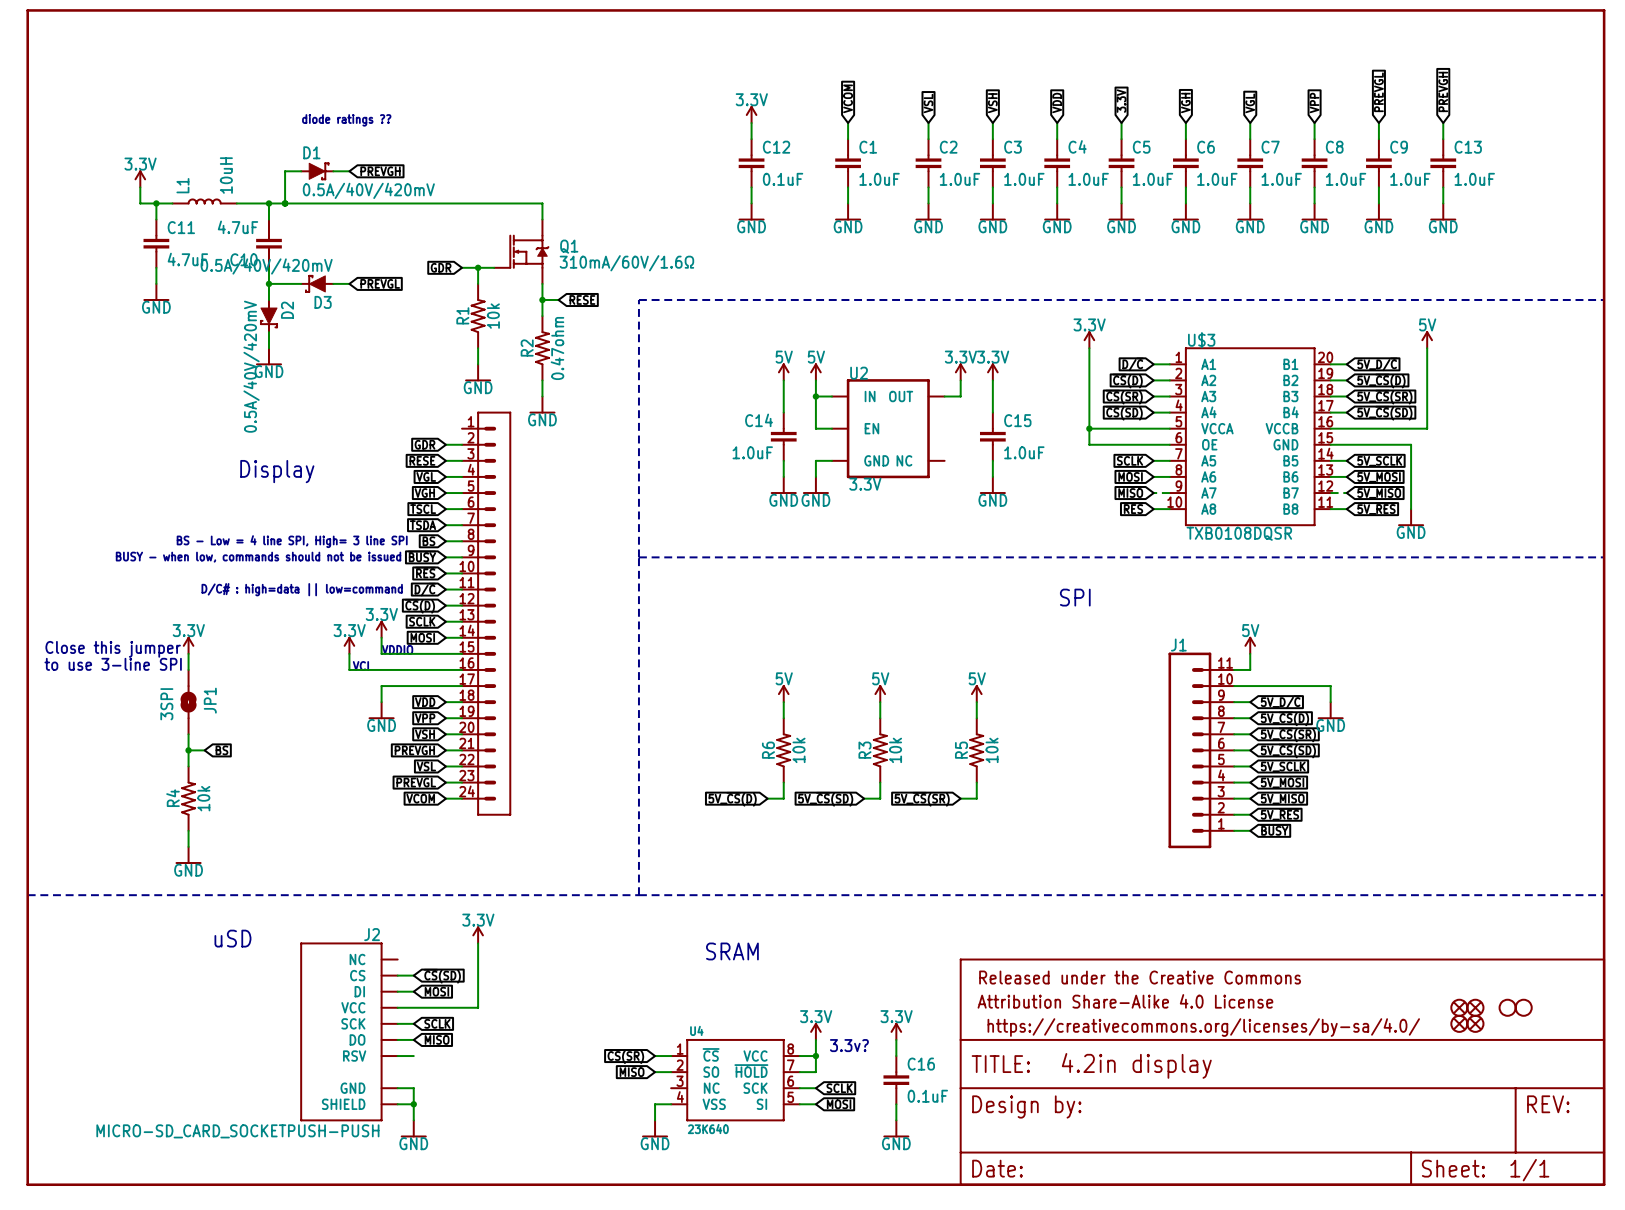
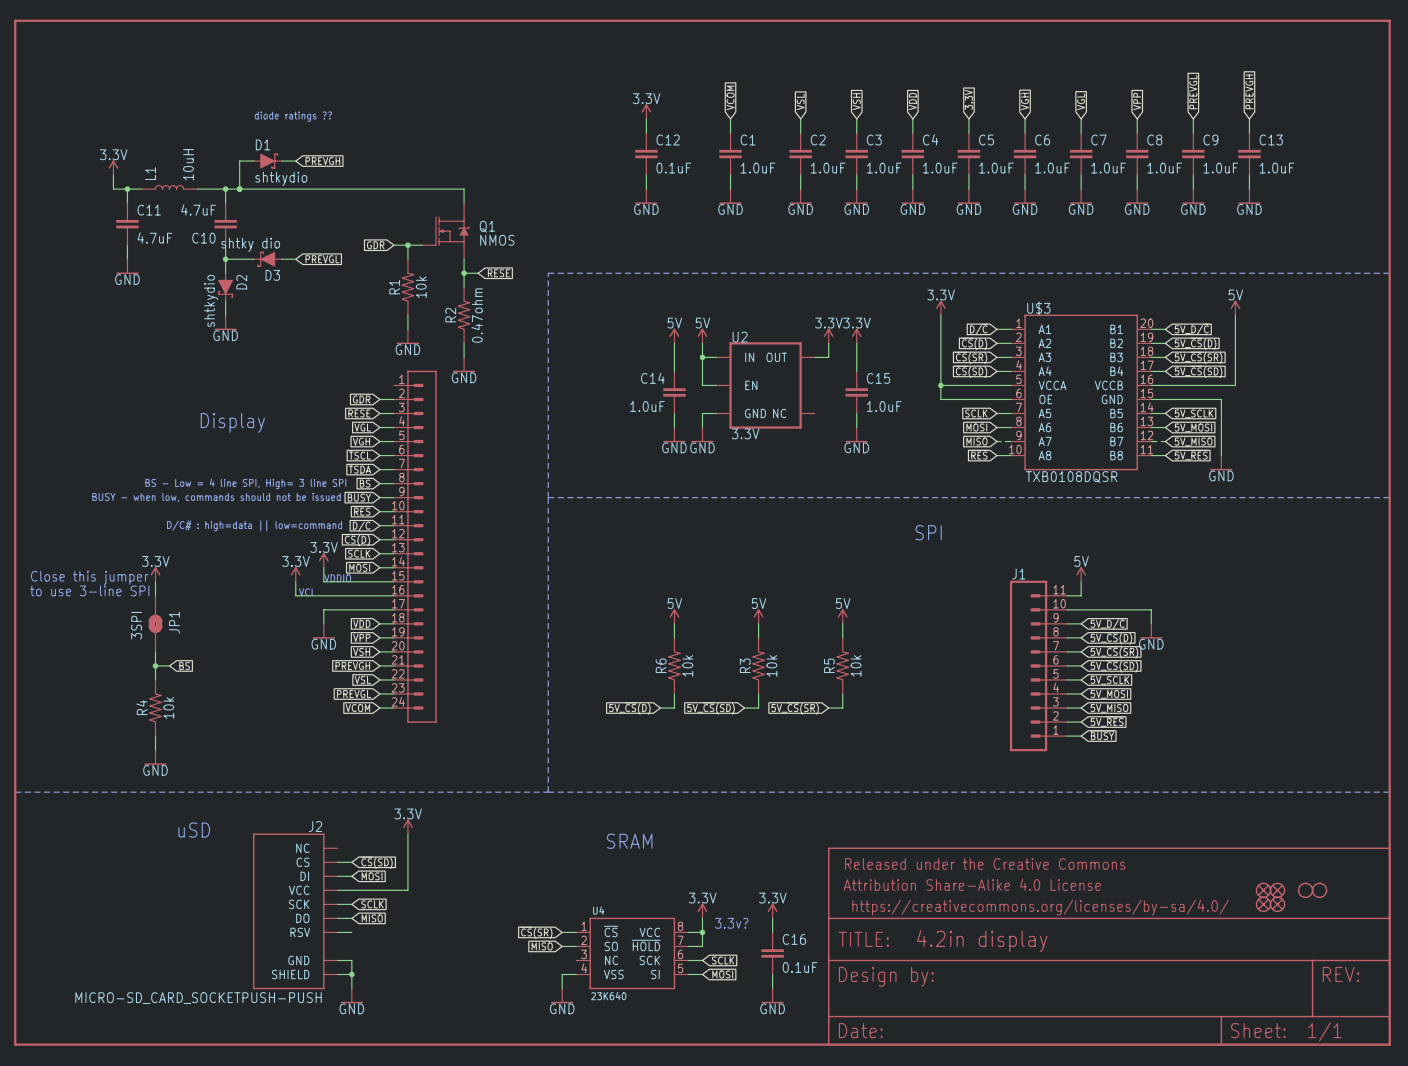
D1 value: 0.5A/40V/420mV (368, 190) -> shtkydio (281, 178)
Q1 value: 310mA/60V/1.6Ω (626, 263) -> NMOS (497, 240)
D3 value: 0.5A/40V/420mV (266, 266) -> shtky dio (250, 244)
D2 value: 0.5A/40V/420mV (251, 366) -> shtkydio (211, 300)

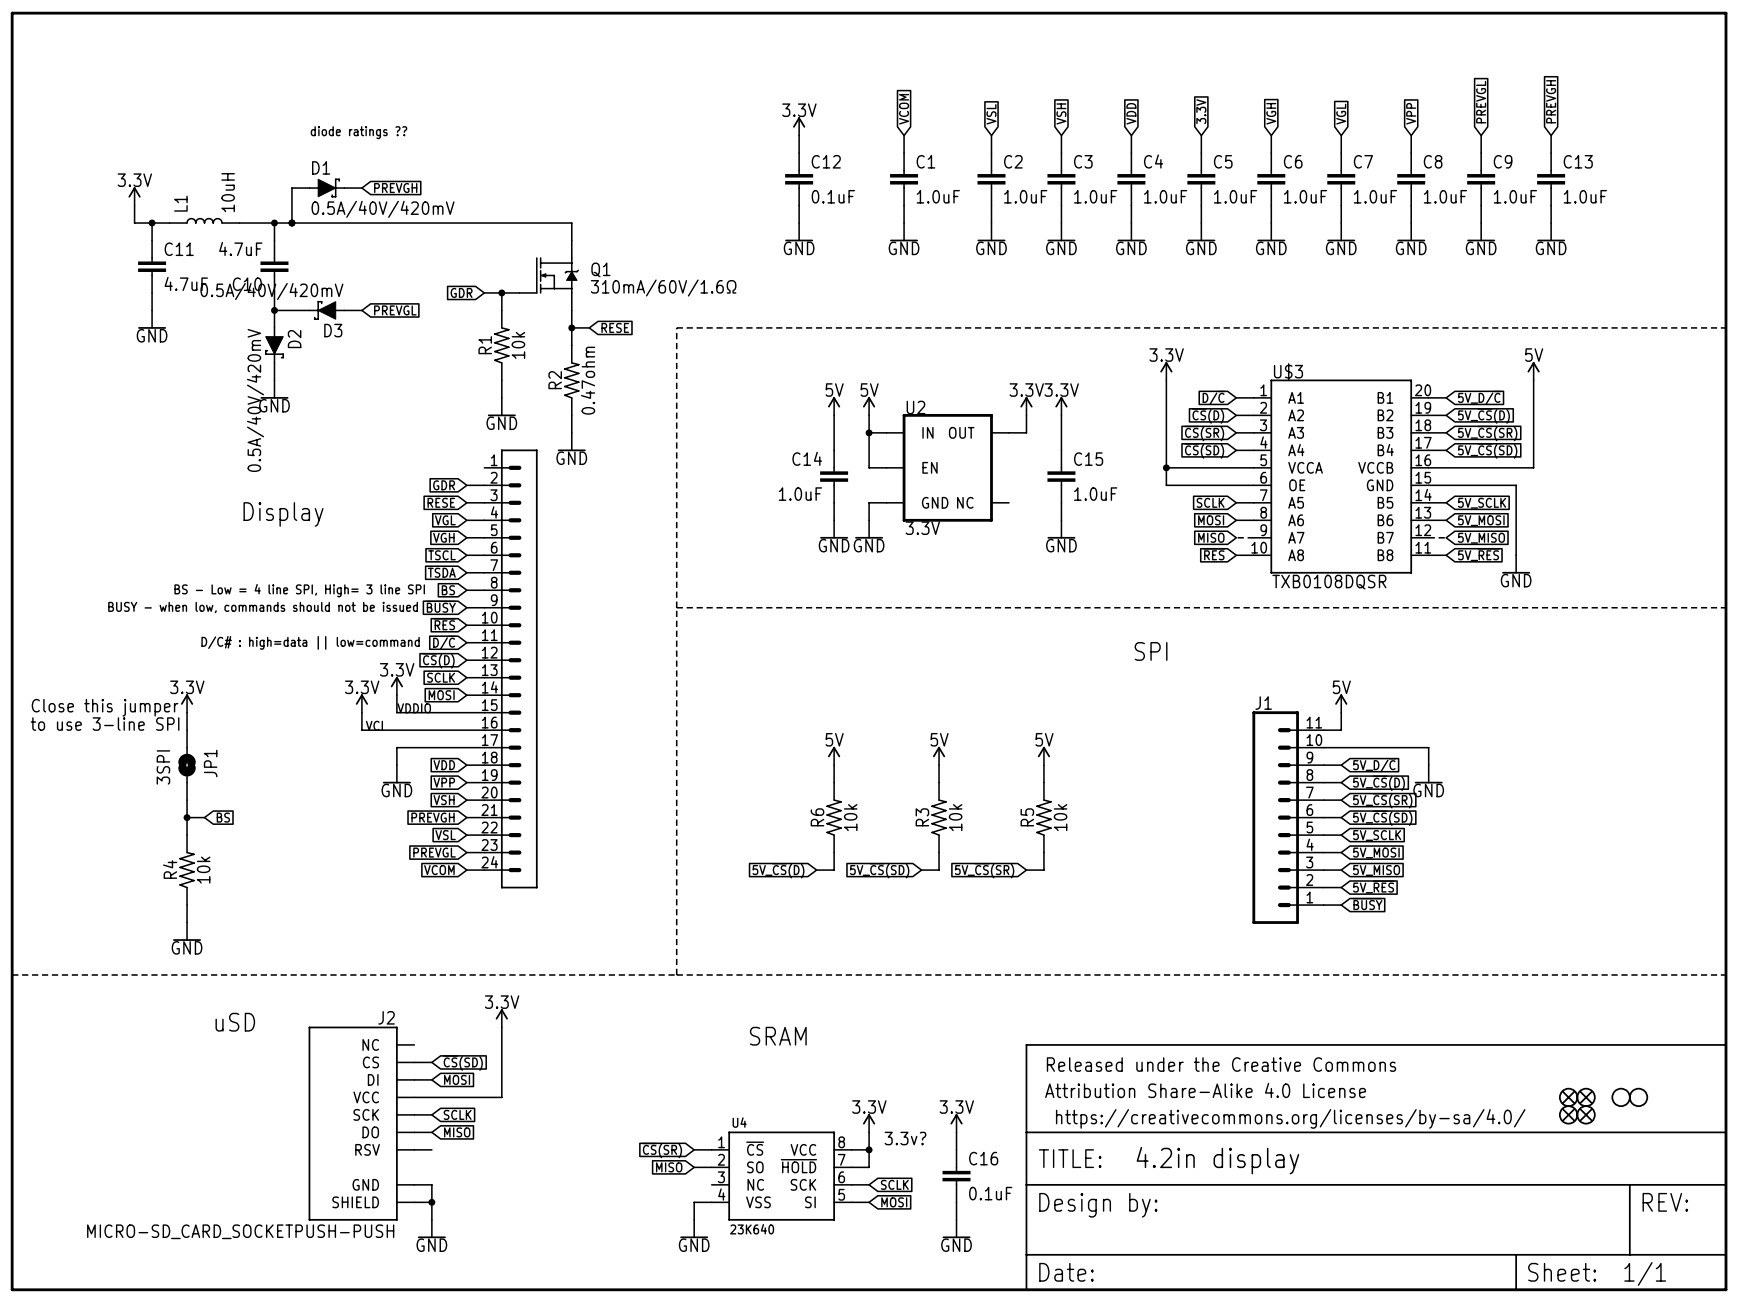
D1 value: shtkydio (281, 178) -> 0.5A/40V/420mV (383, 209)
Q1 value: NMOS (497, 240) -> 310mA/60V/1.6Ω (663, 288)
D3 value: shtky dio (250, 244) -> 0.5A/40V/420mV (271, 291)
D2 value: shtkydio (211, 300) -> 0.5A/40V/420mV (255, 400)

